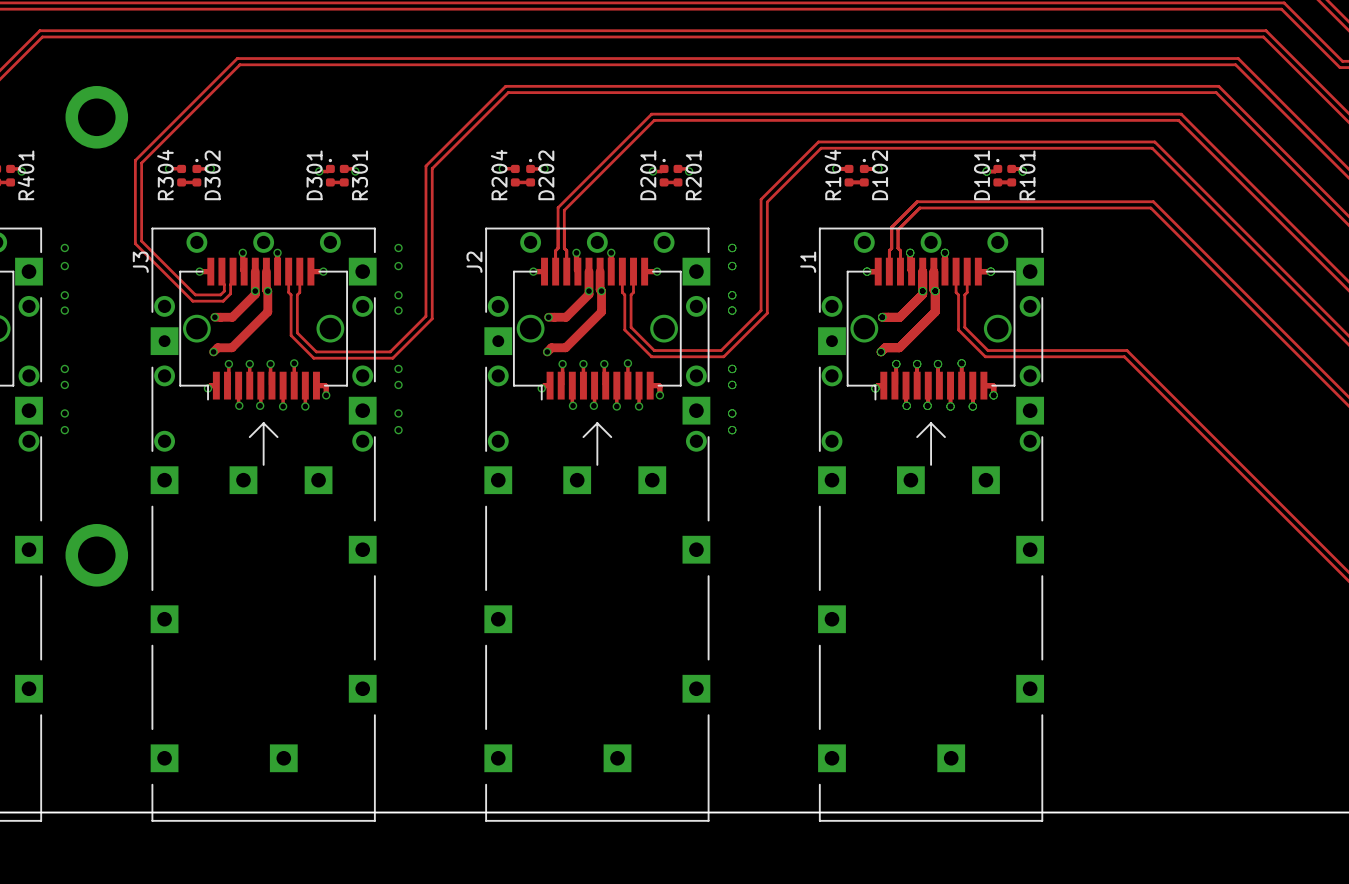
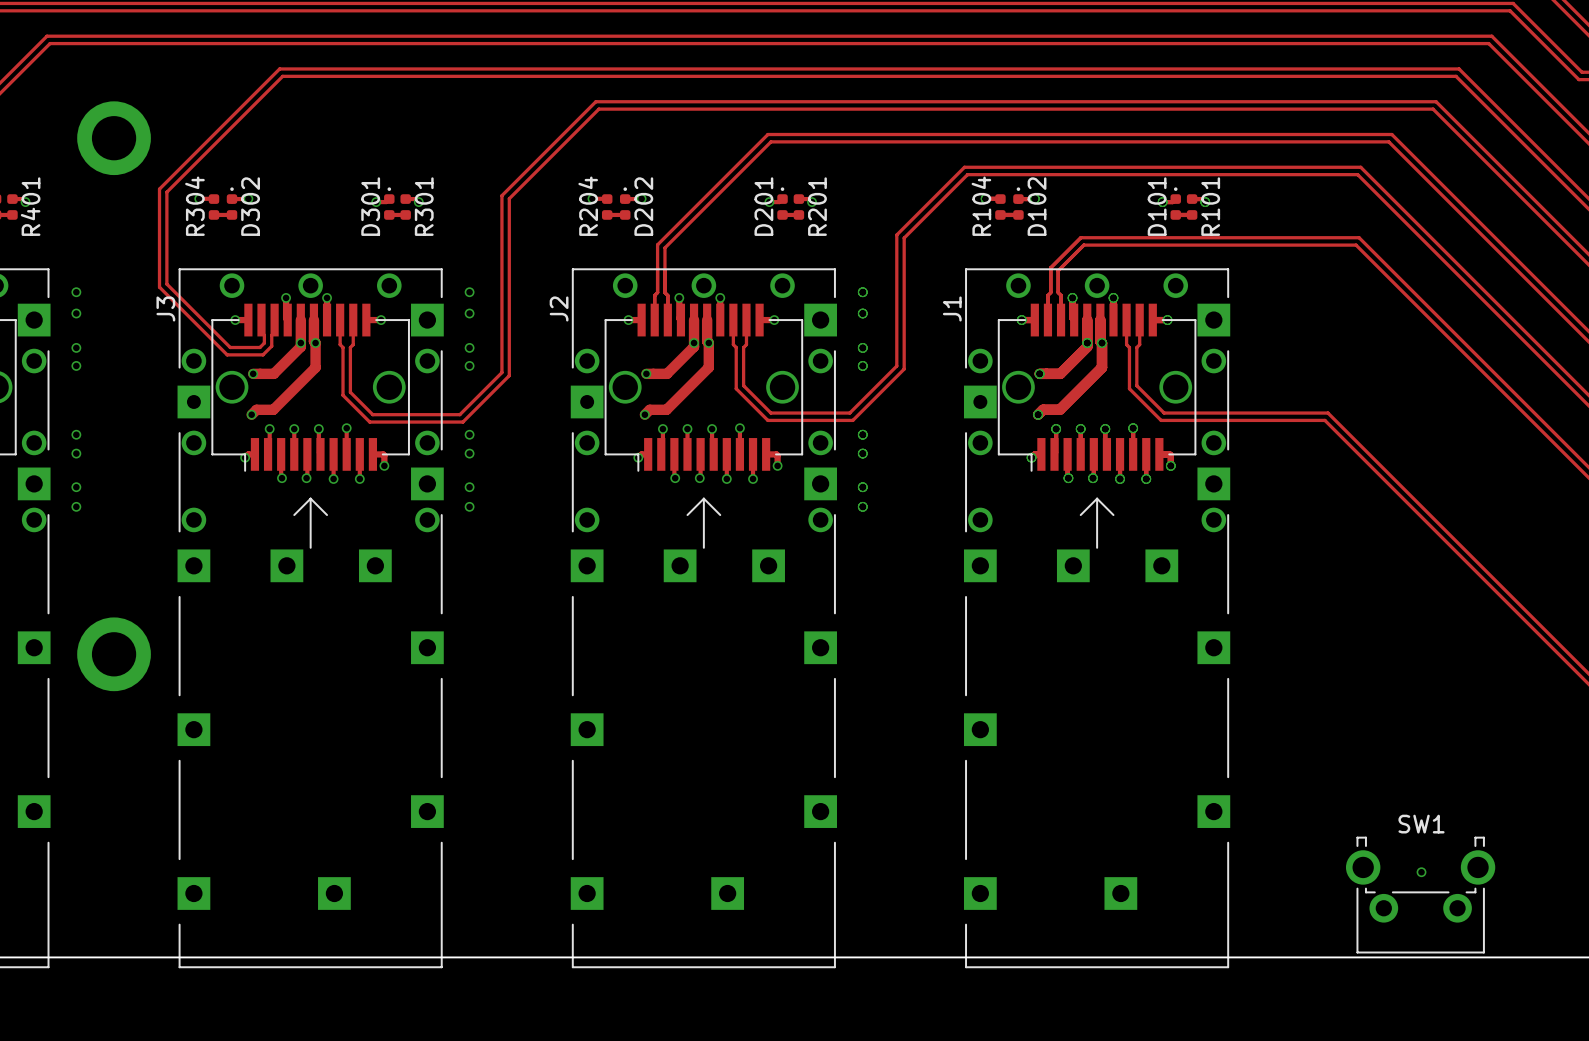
via: none -> (1421, 872)
SW1: none -> (1420, 895)

